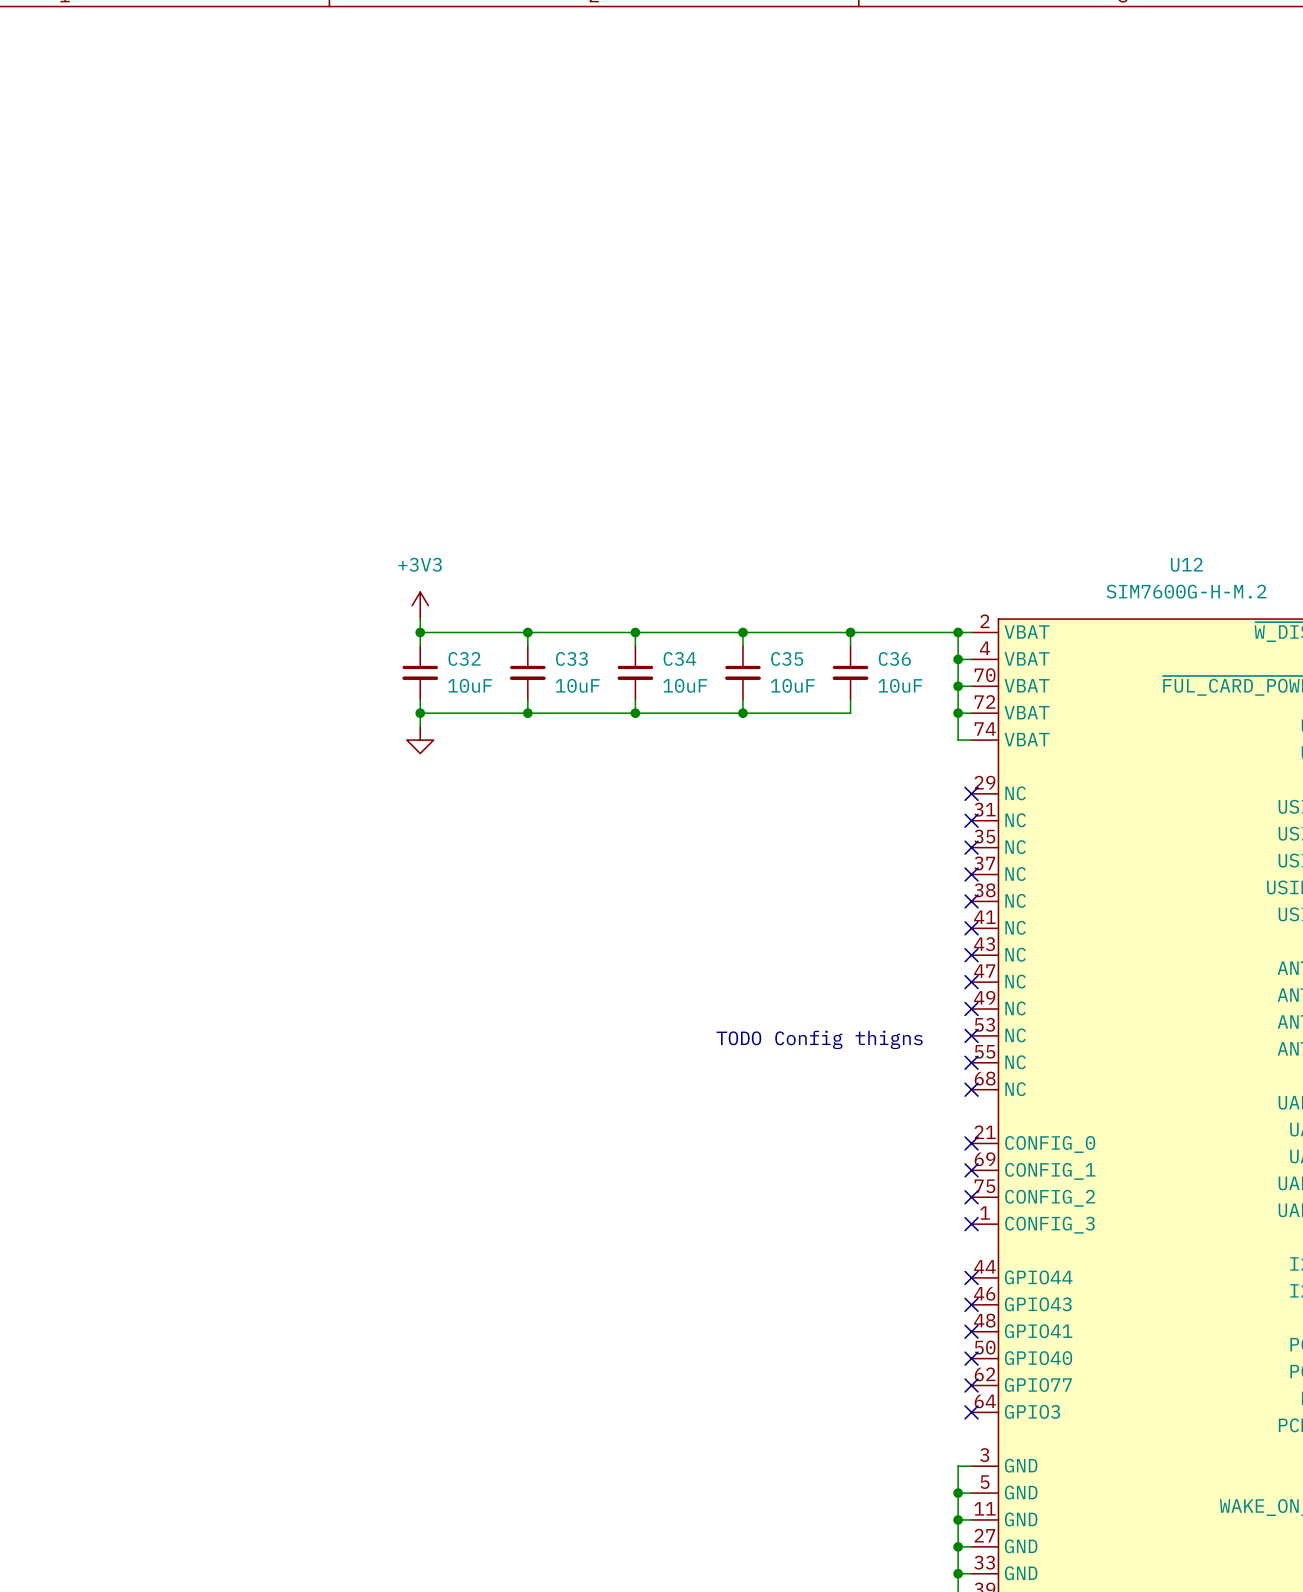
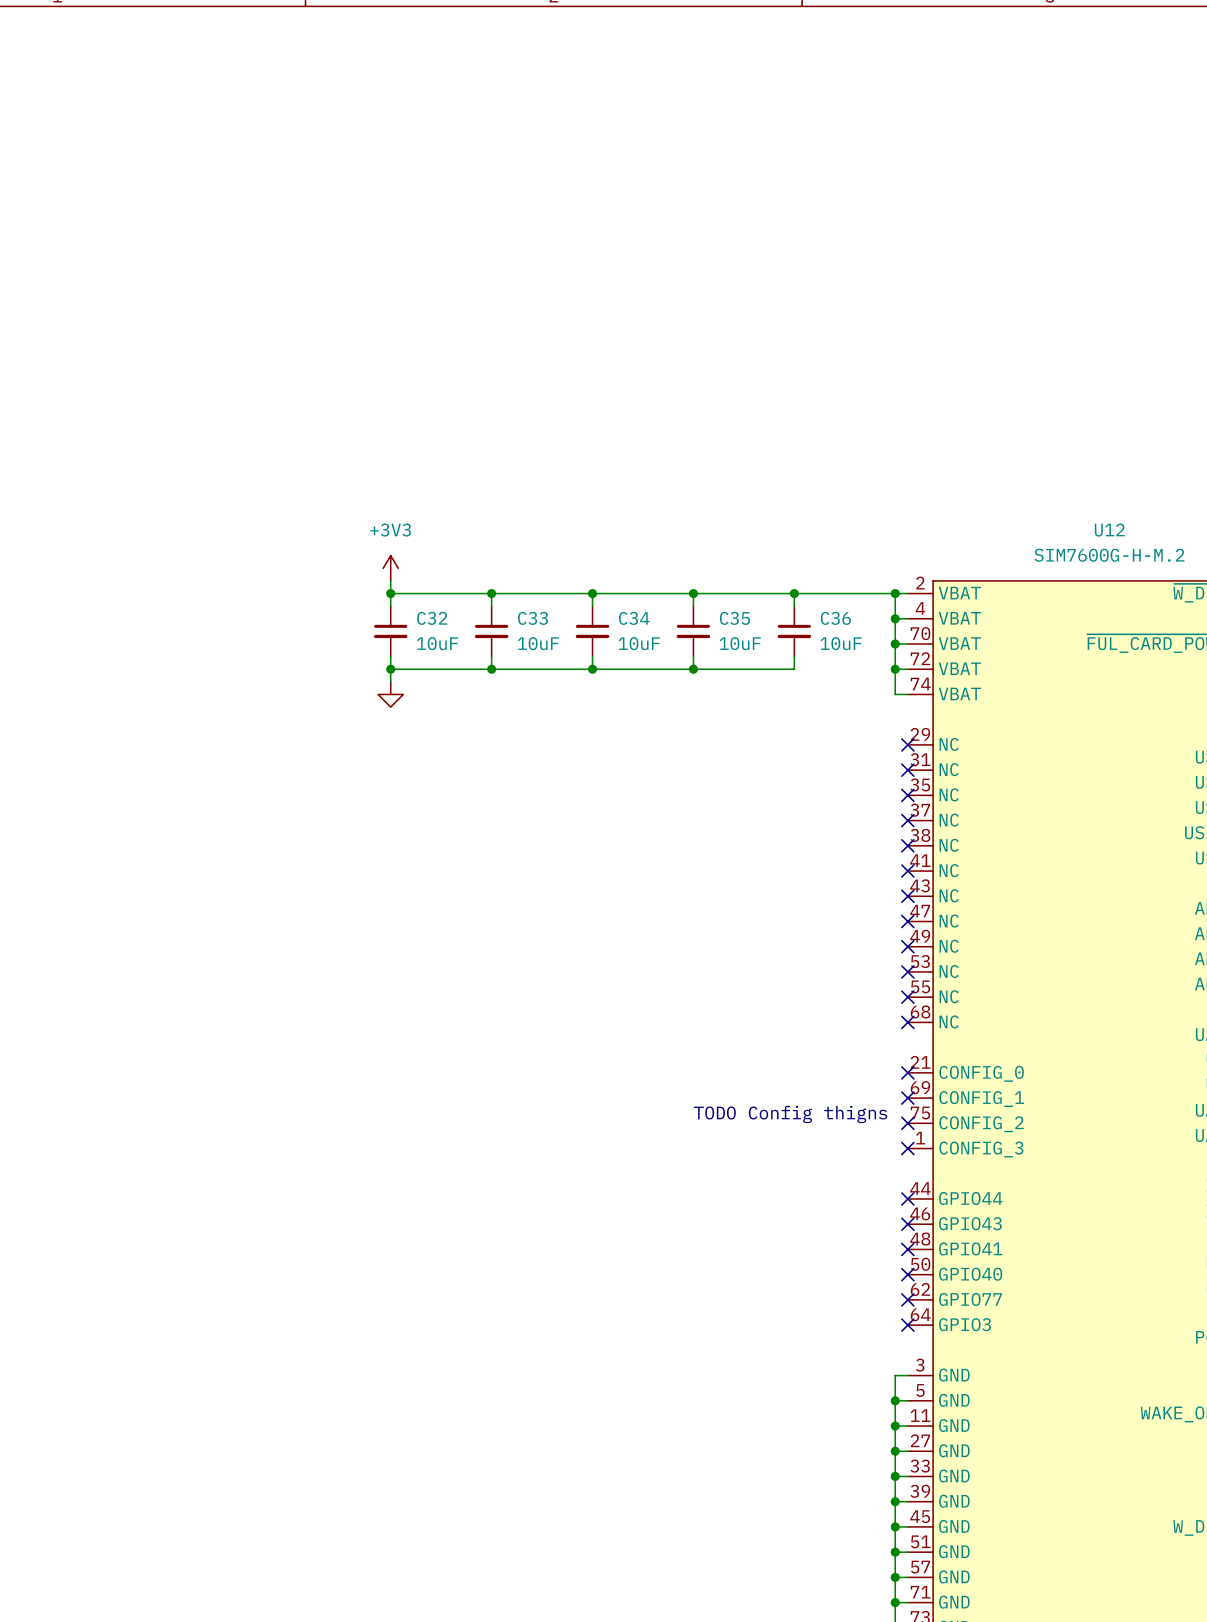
text position: TODO Config thigns (819, 1039) -> TODO Config thigns (790, 1114)

